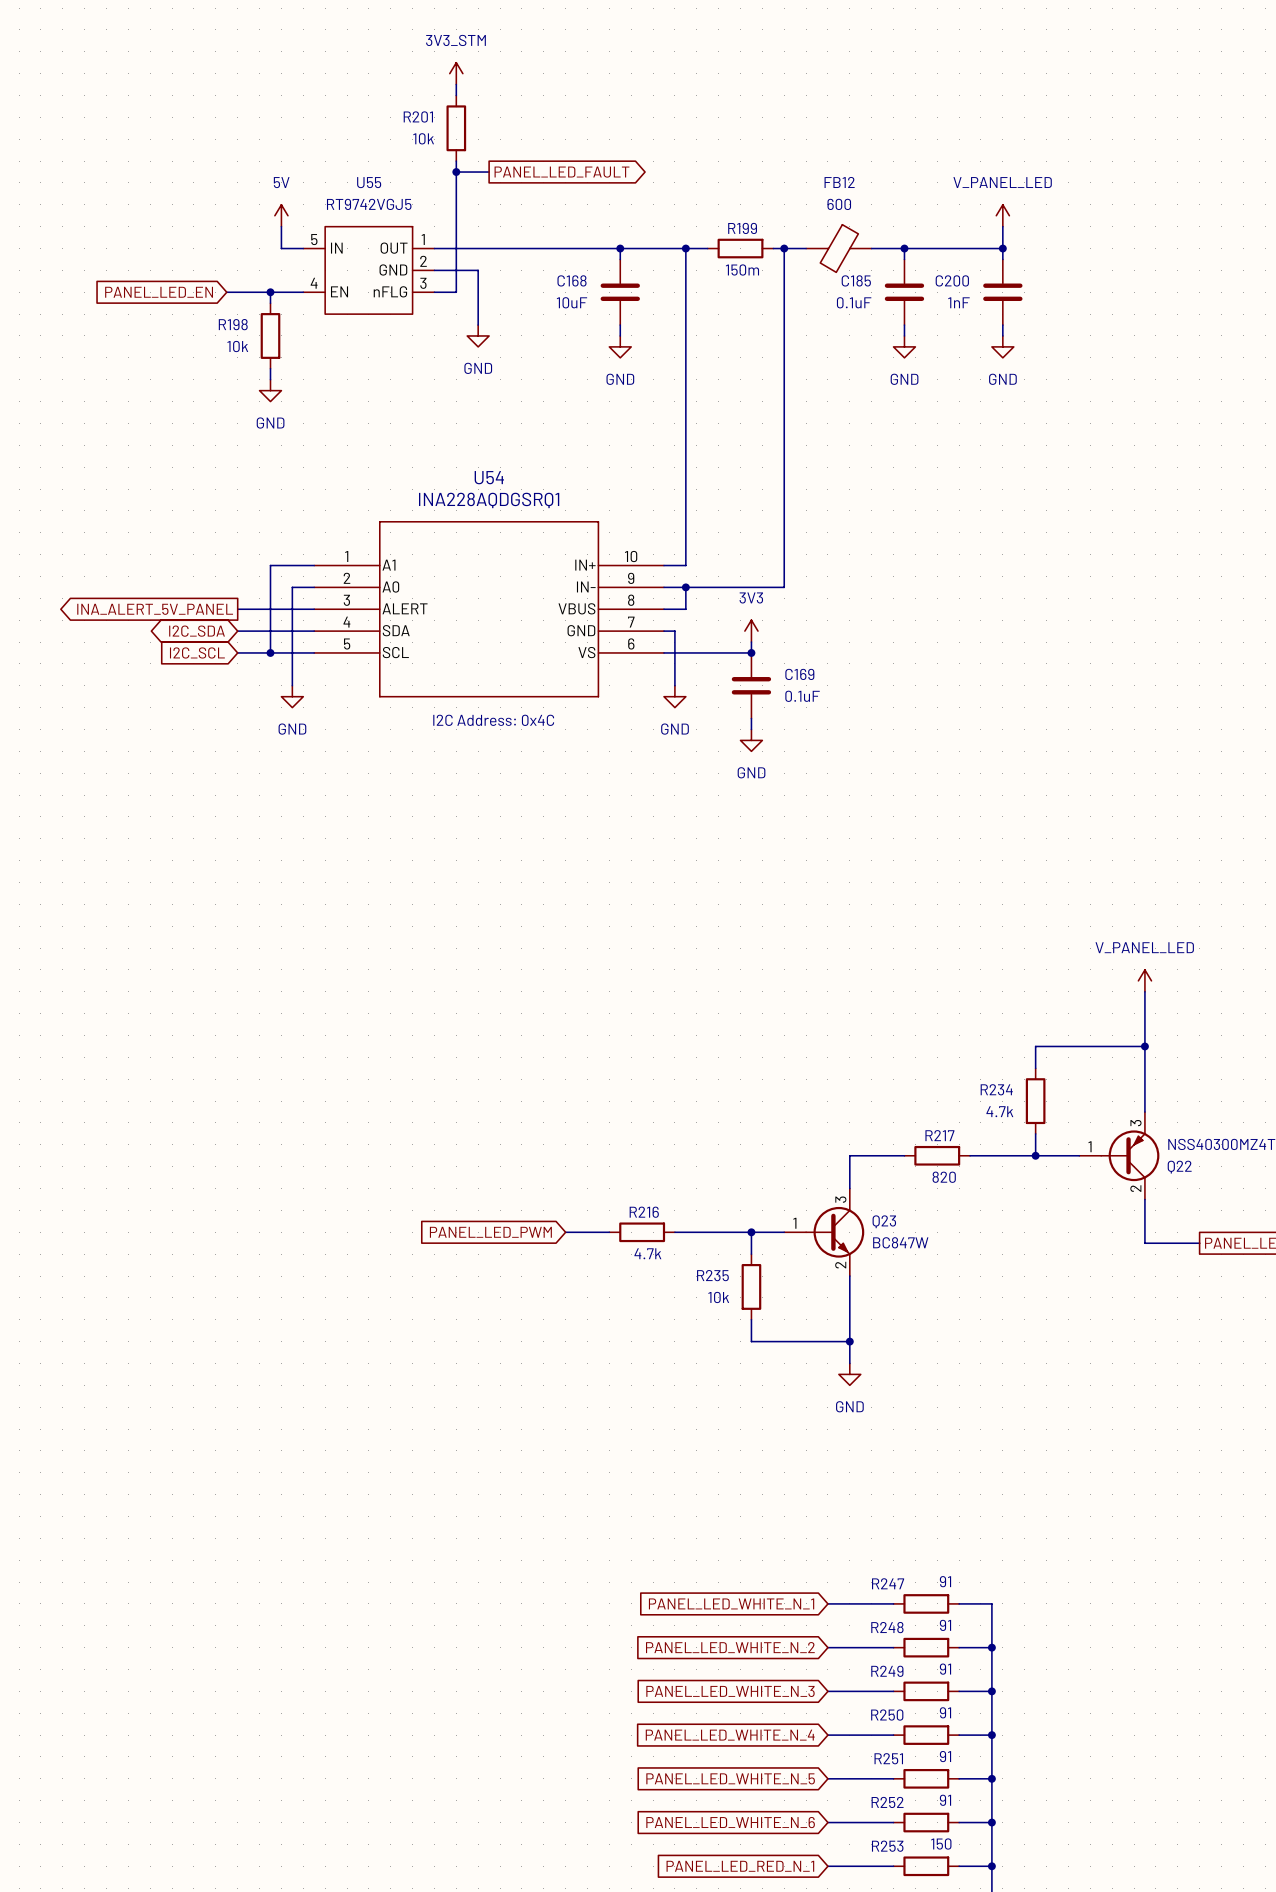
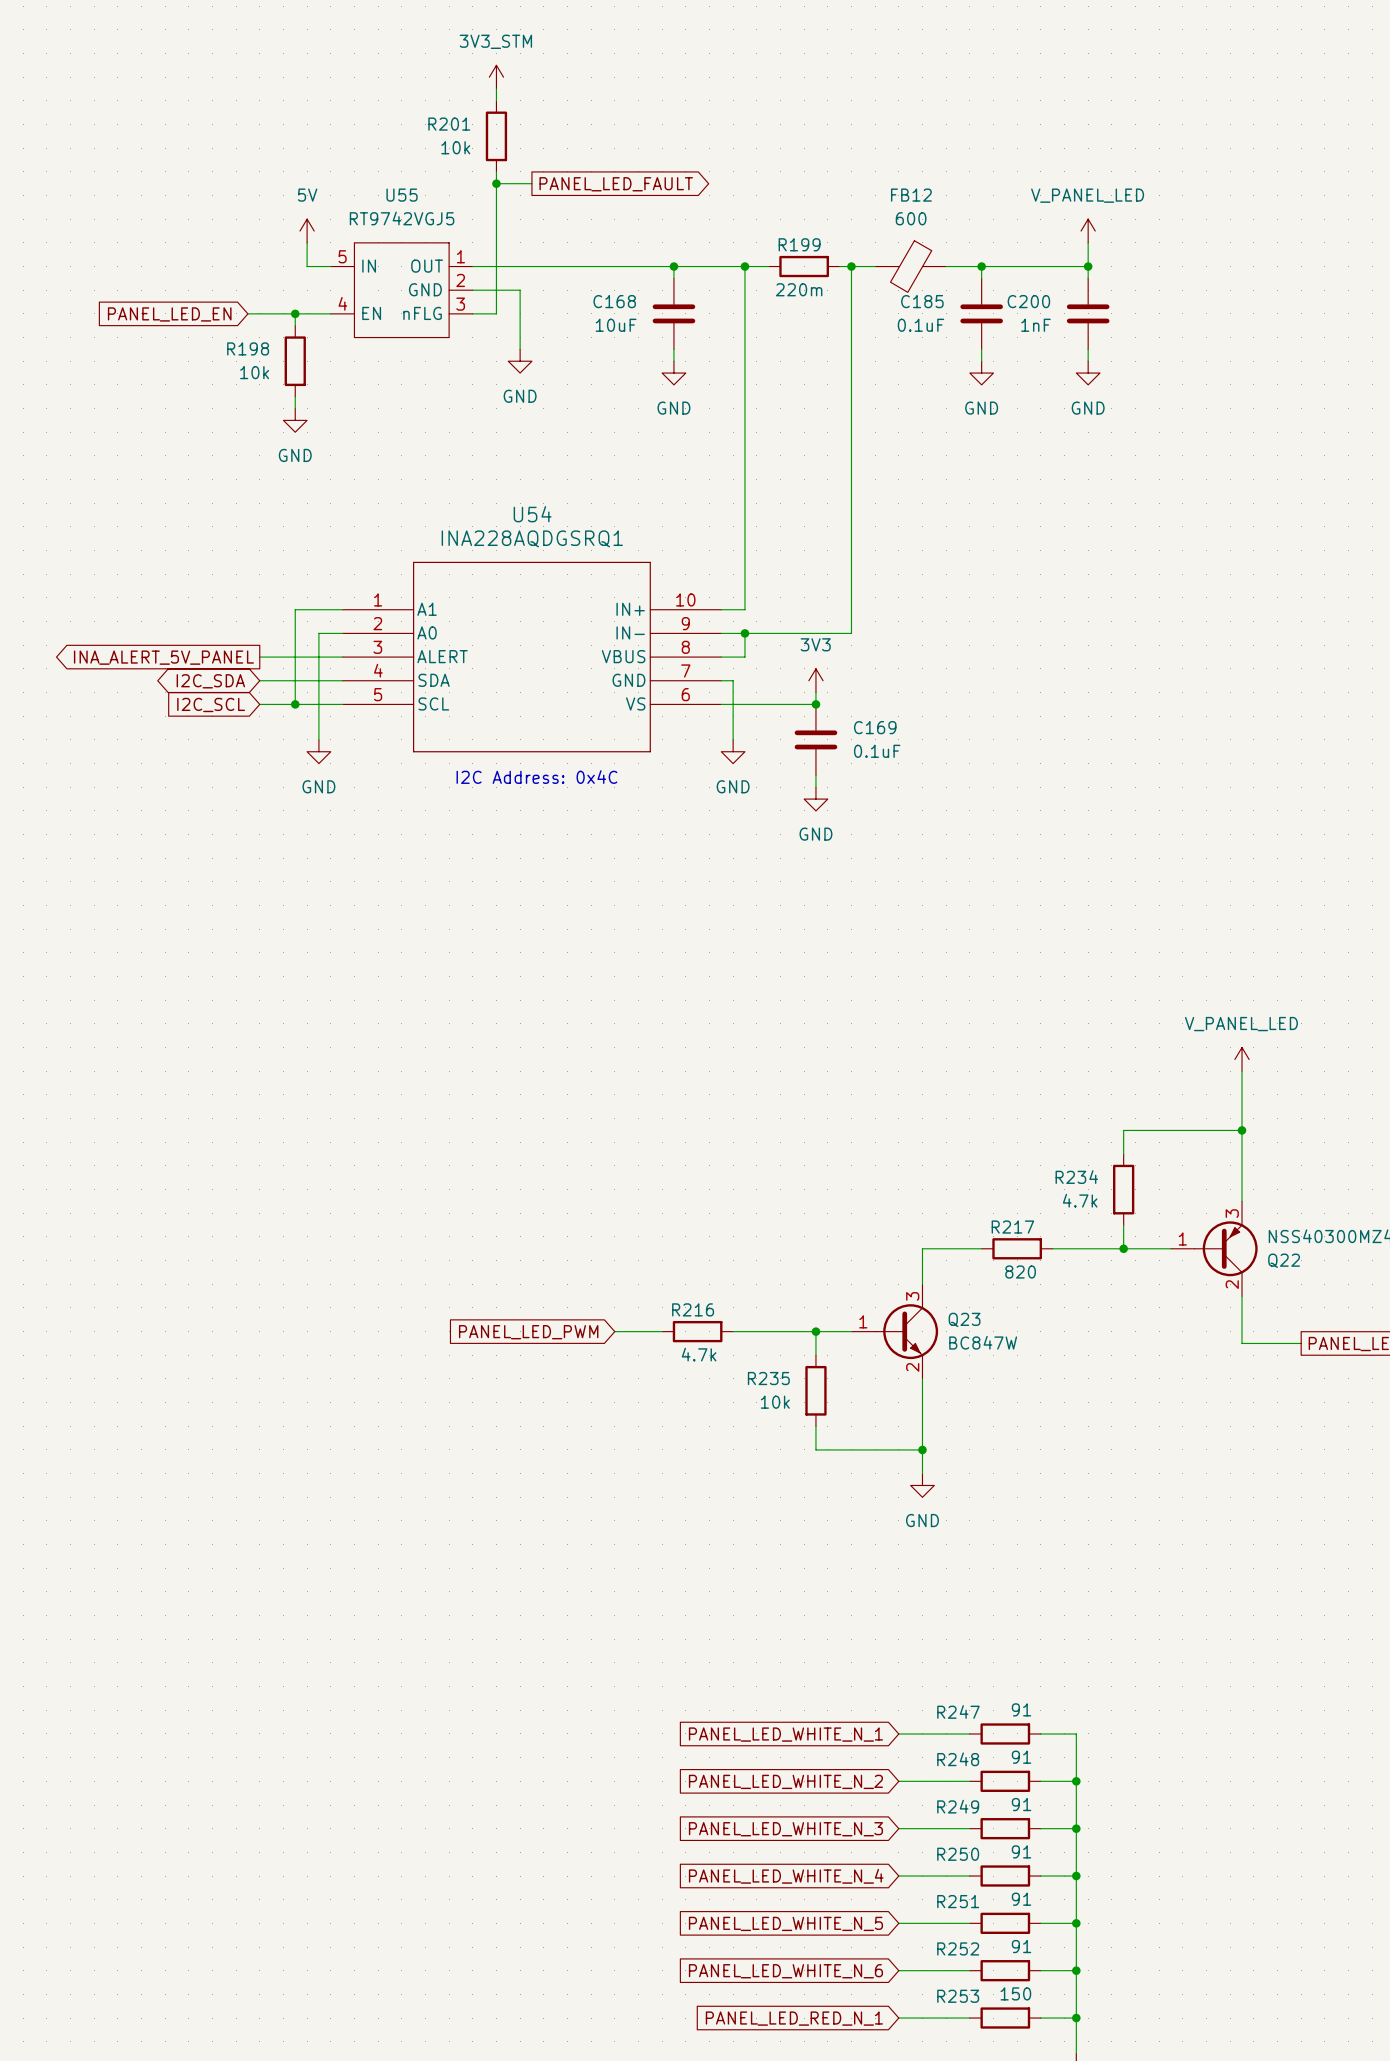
R199 value: 150m (742, 269) -> 220m (799, 289)

